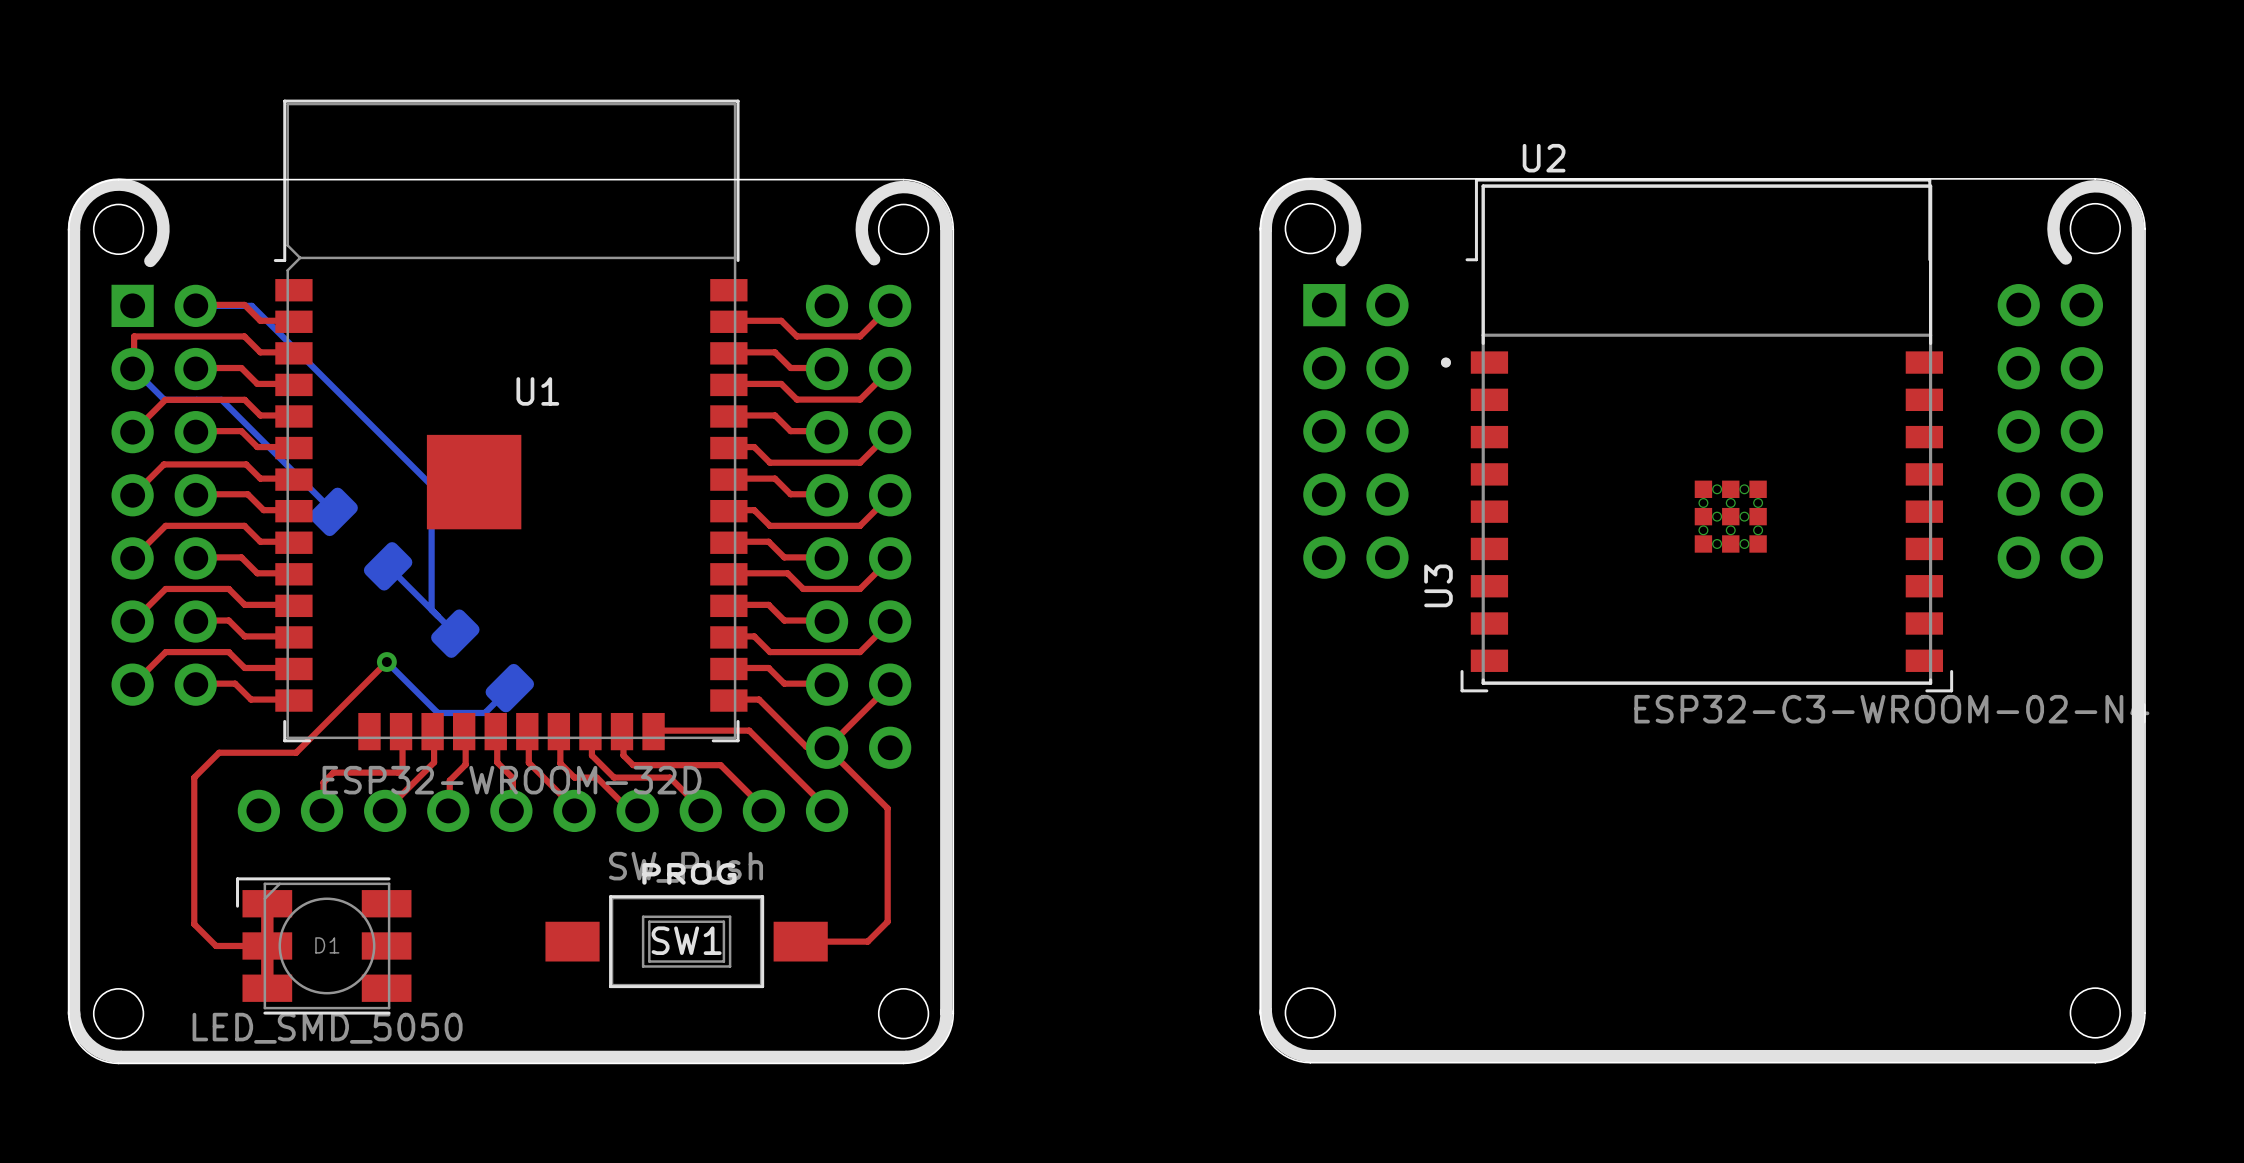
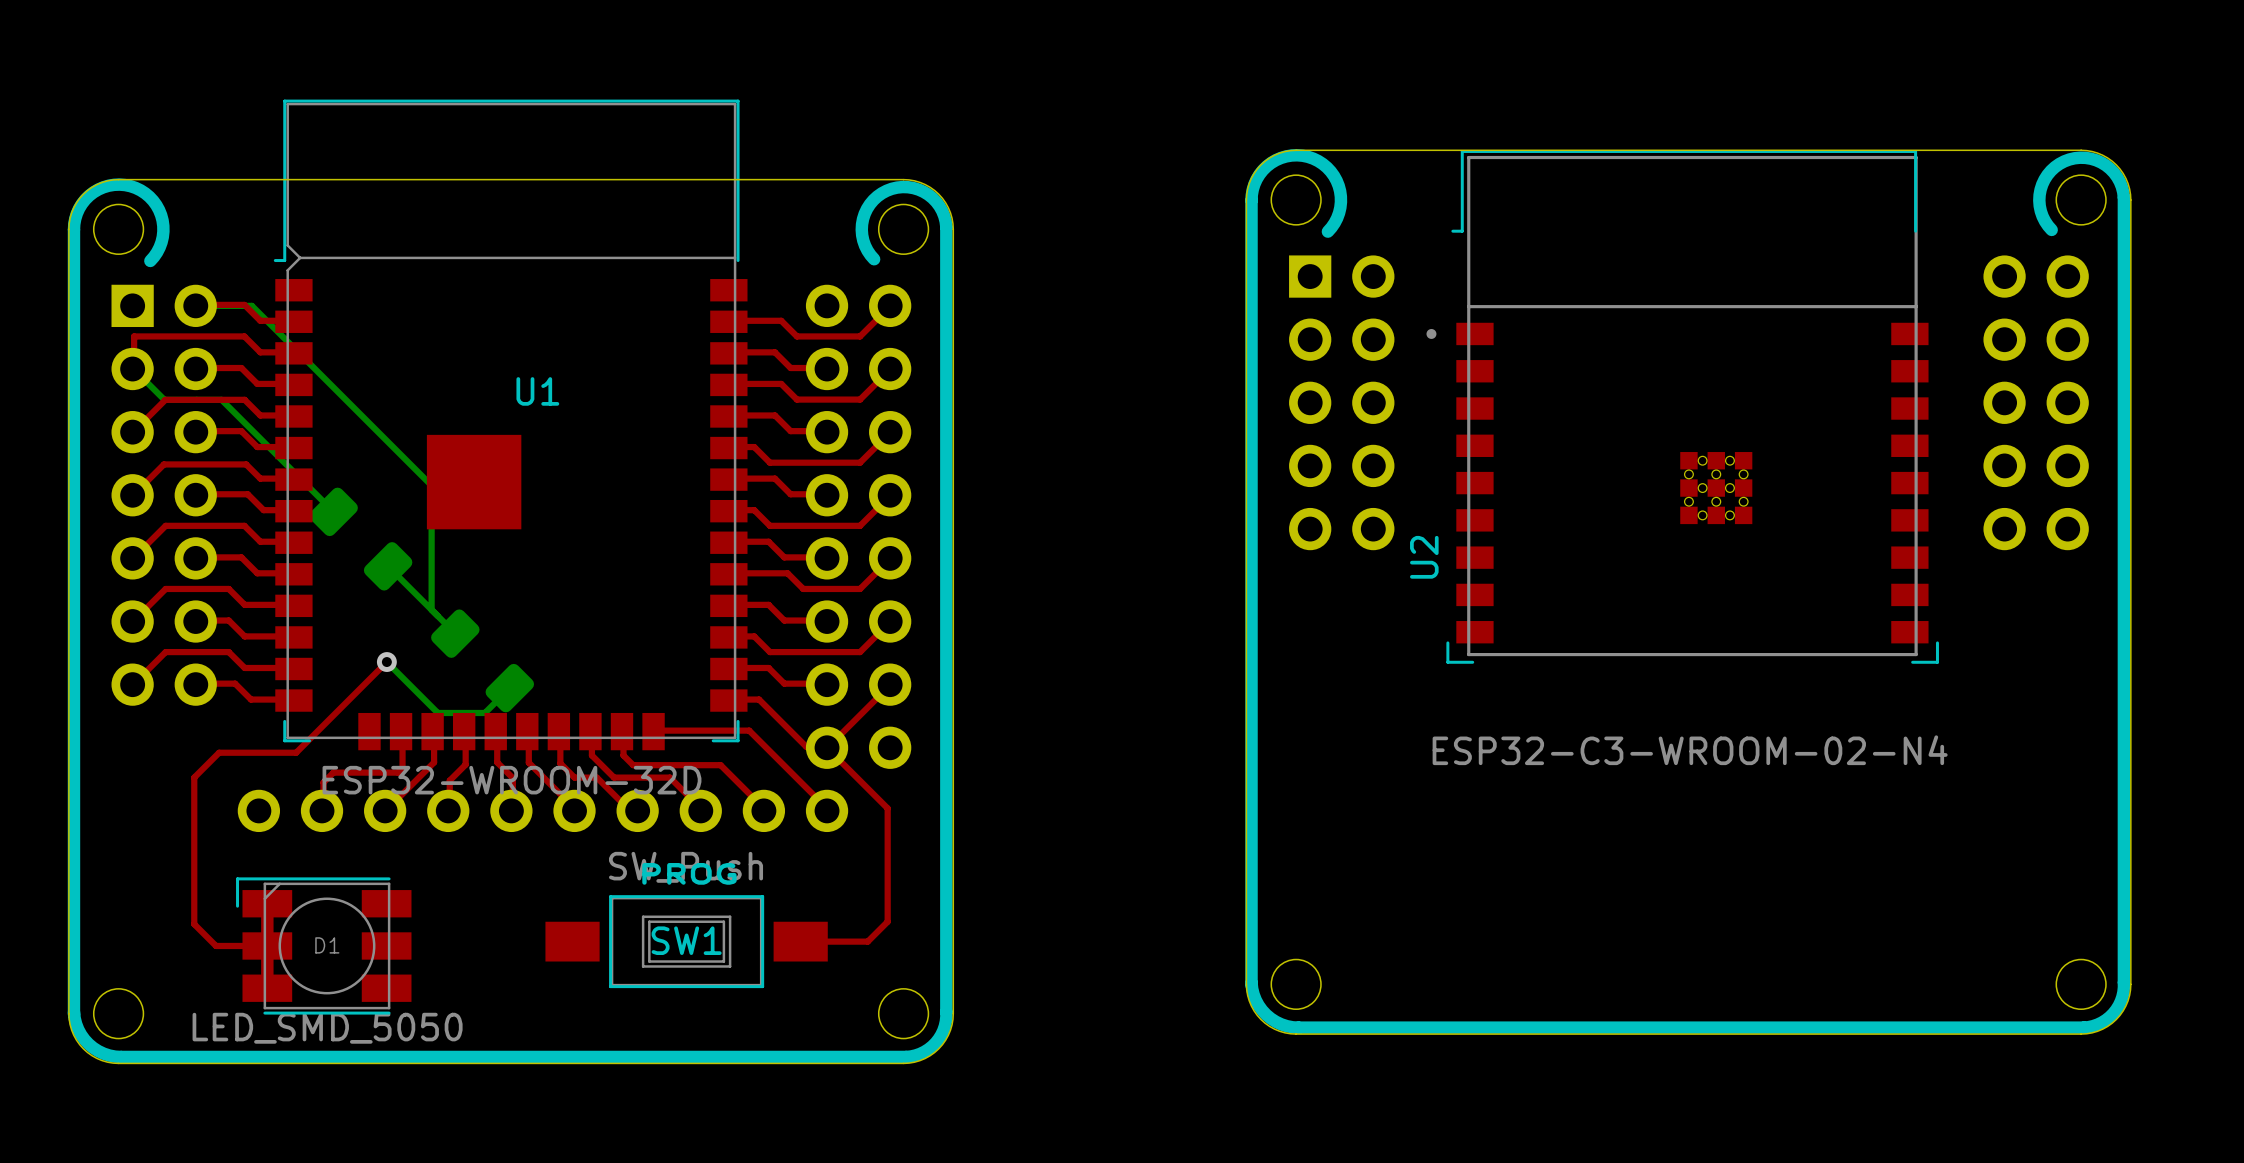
U2 name position: U2 (1544, 158) -> U2 (1424, 557)
U2 footprint: [1440, 184, 1944, 685] -> [1245, 149, 2132, 1035]
U3: (1702, 620) -> none
U2 value position: ESP32-C3-WROOM-02-N4 (1891, 708) -> ESP32-C3-WROOM-02-N4 (1690, 750)

